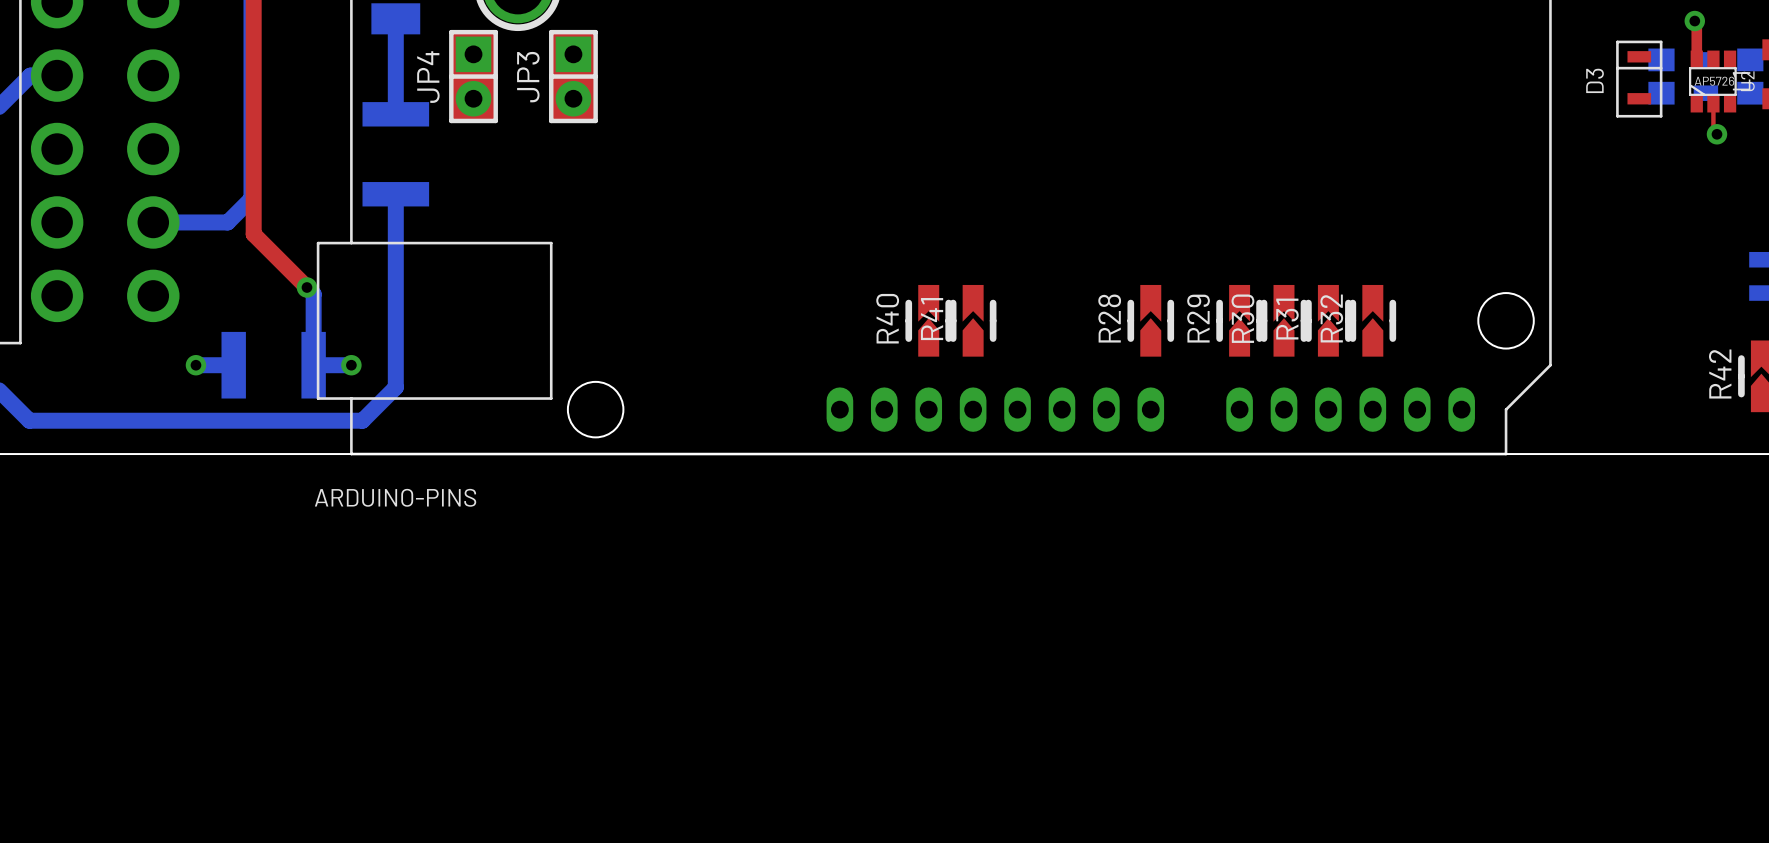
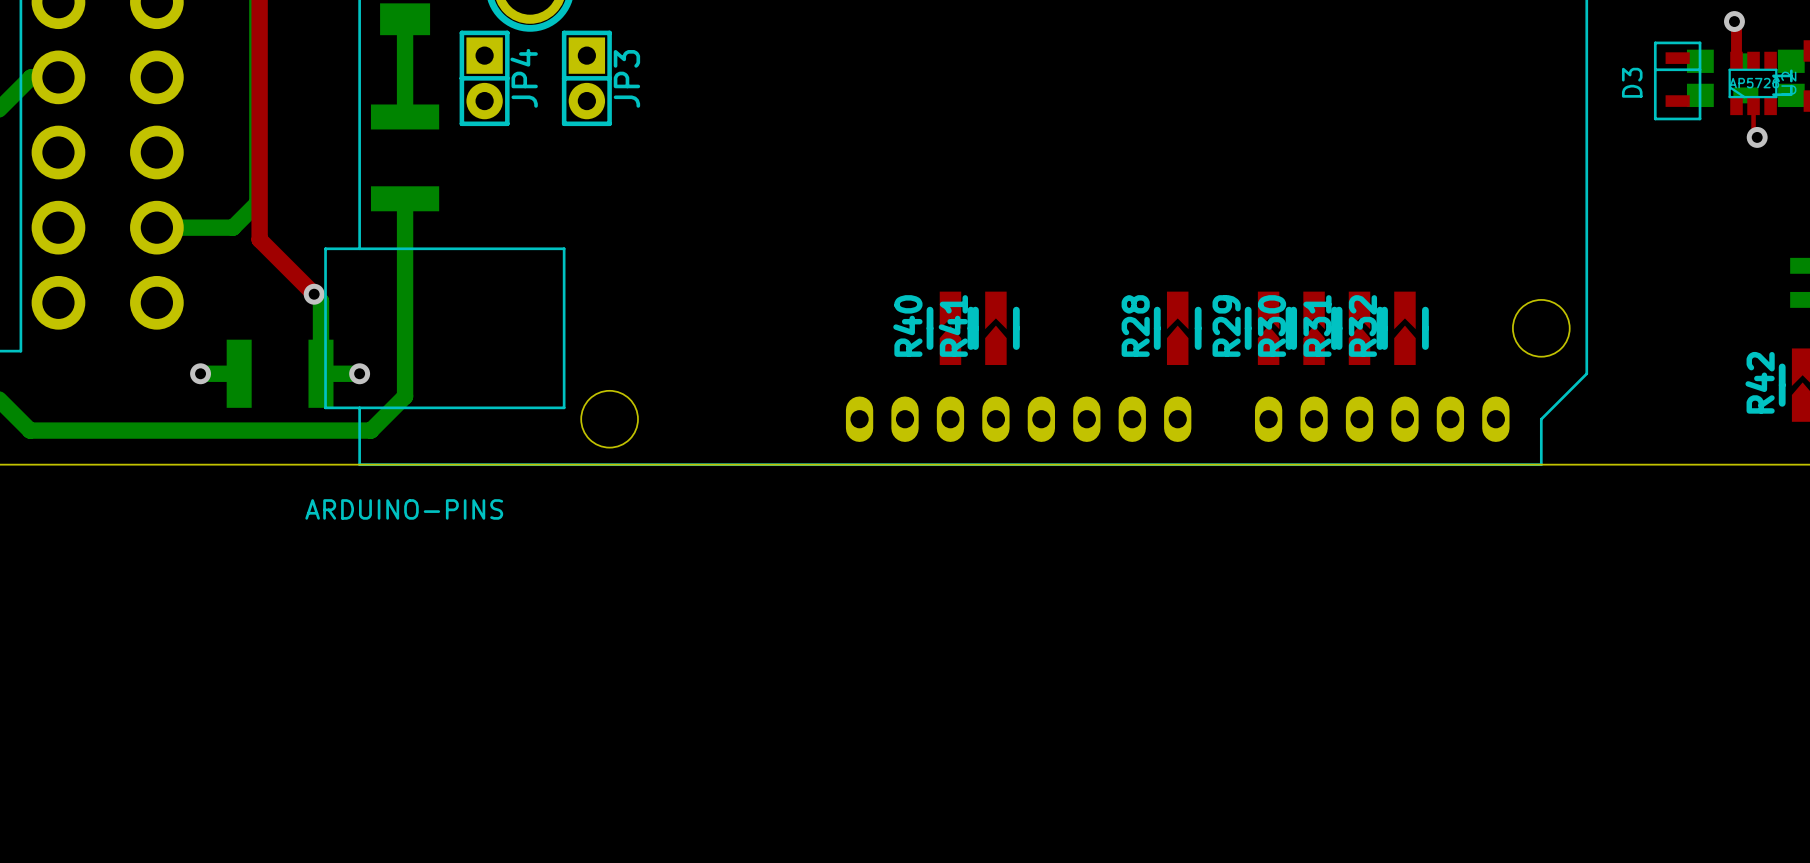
JP4 footprint: [449, 29, 498, 124] -> [459, 30, 510, 127]
JP3 footprint: [549, 29, 598, 124] -> [561, 30, 612, 127]
JP4 name position: JP4 (428, 77) -> JP4 (524, 78)
JP3 name position: JP3 (528, 77) -> JP3 (626, 78)

